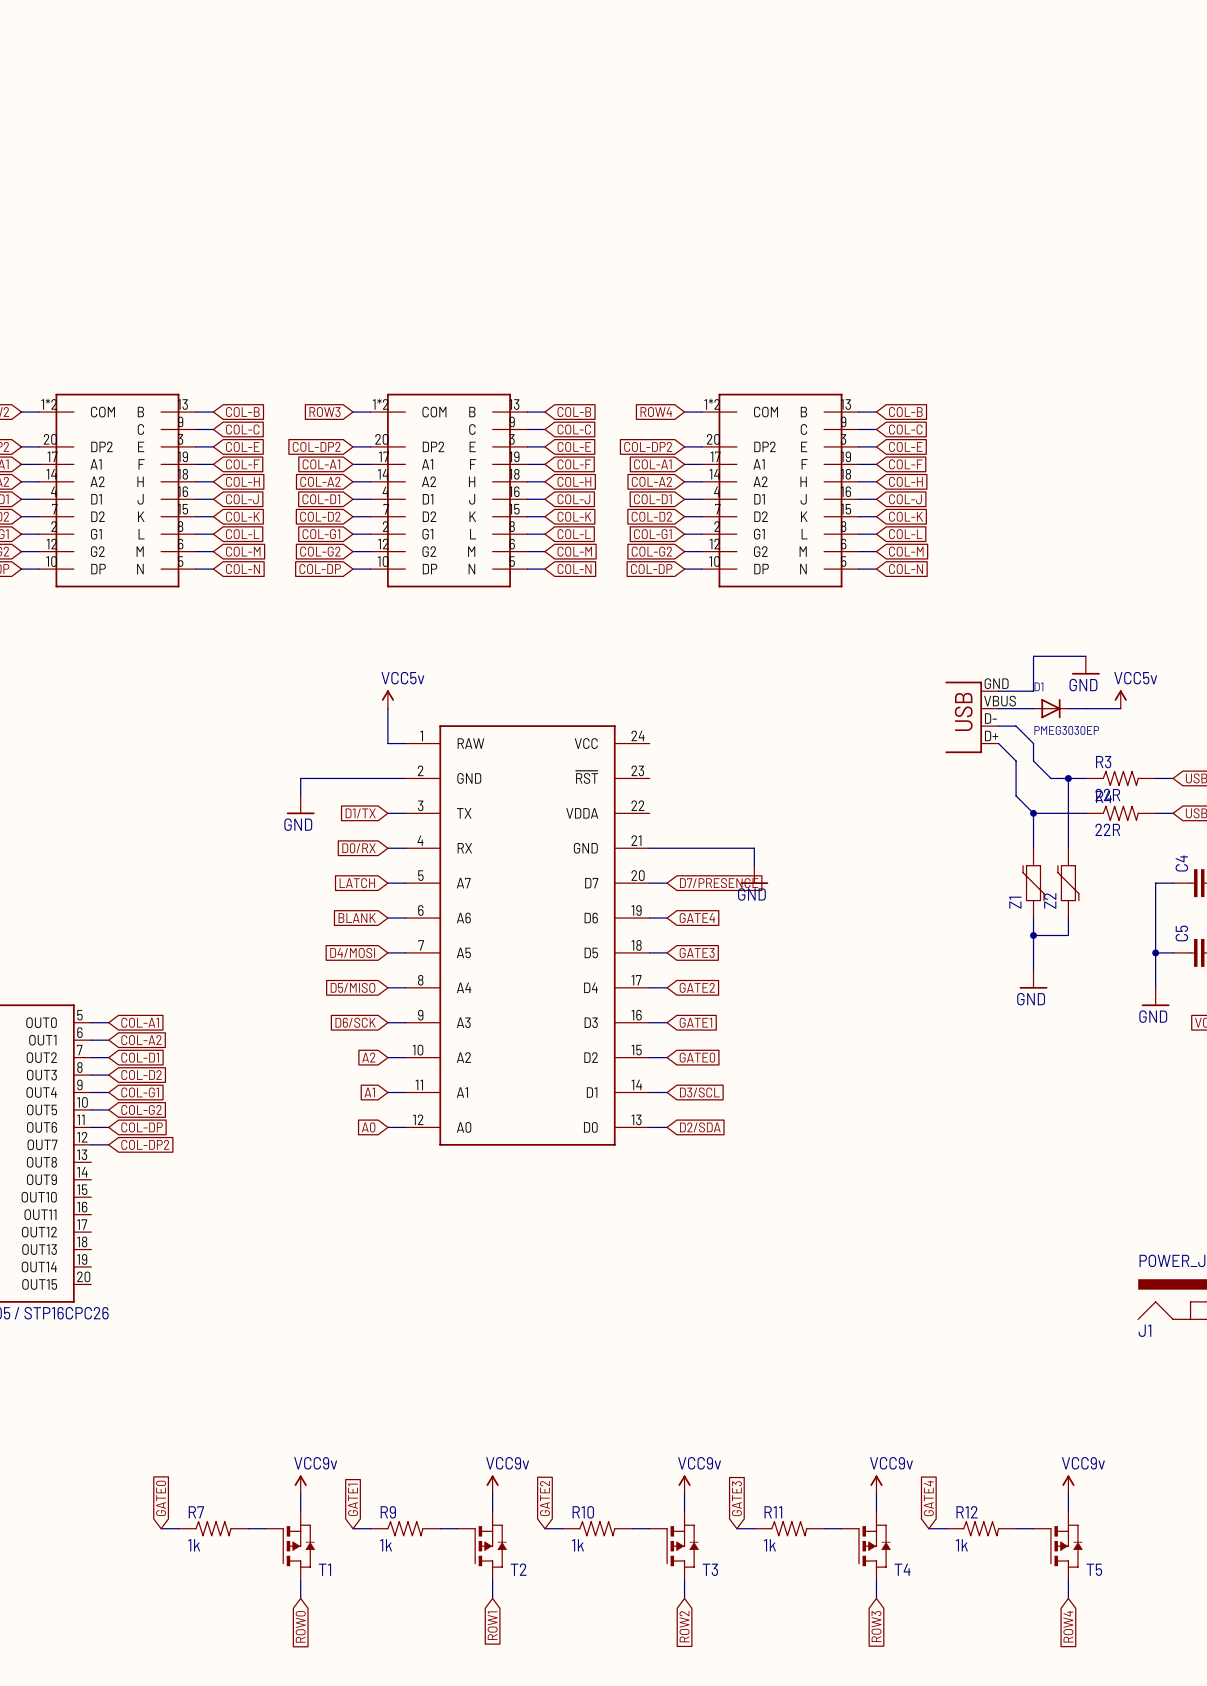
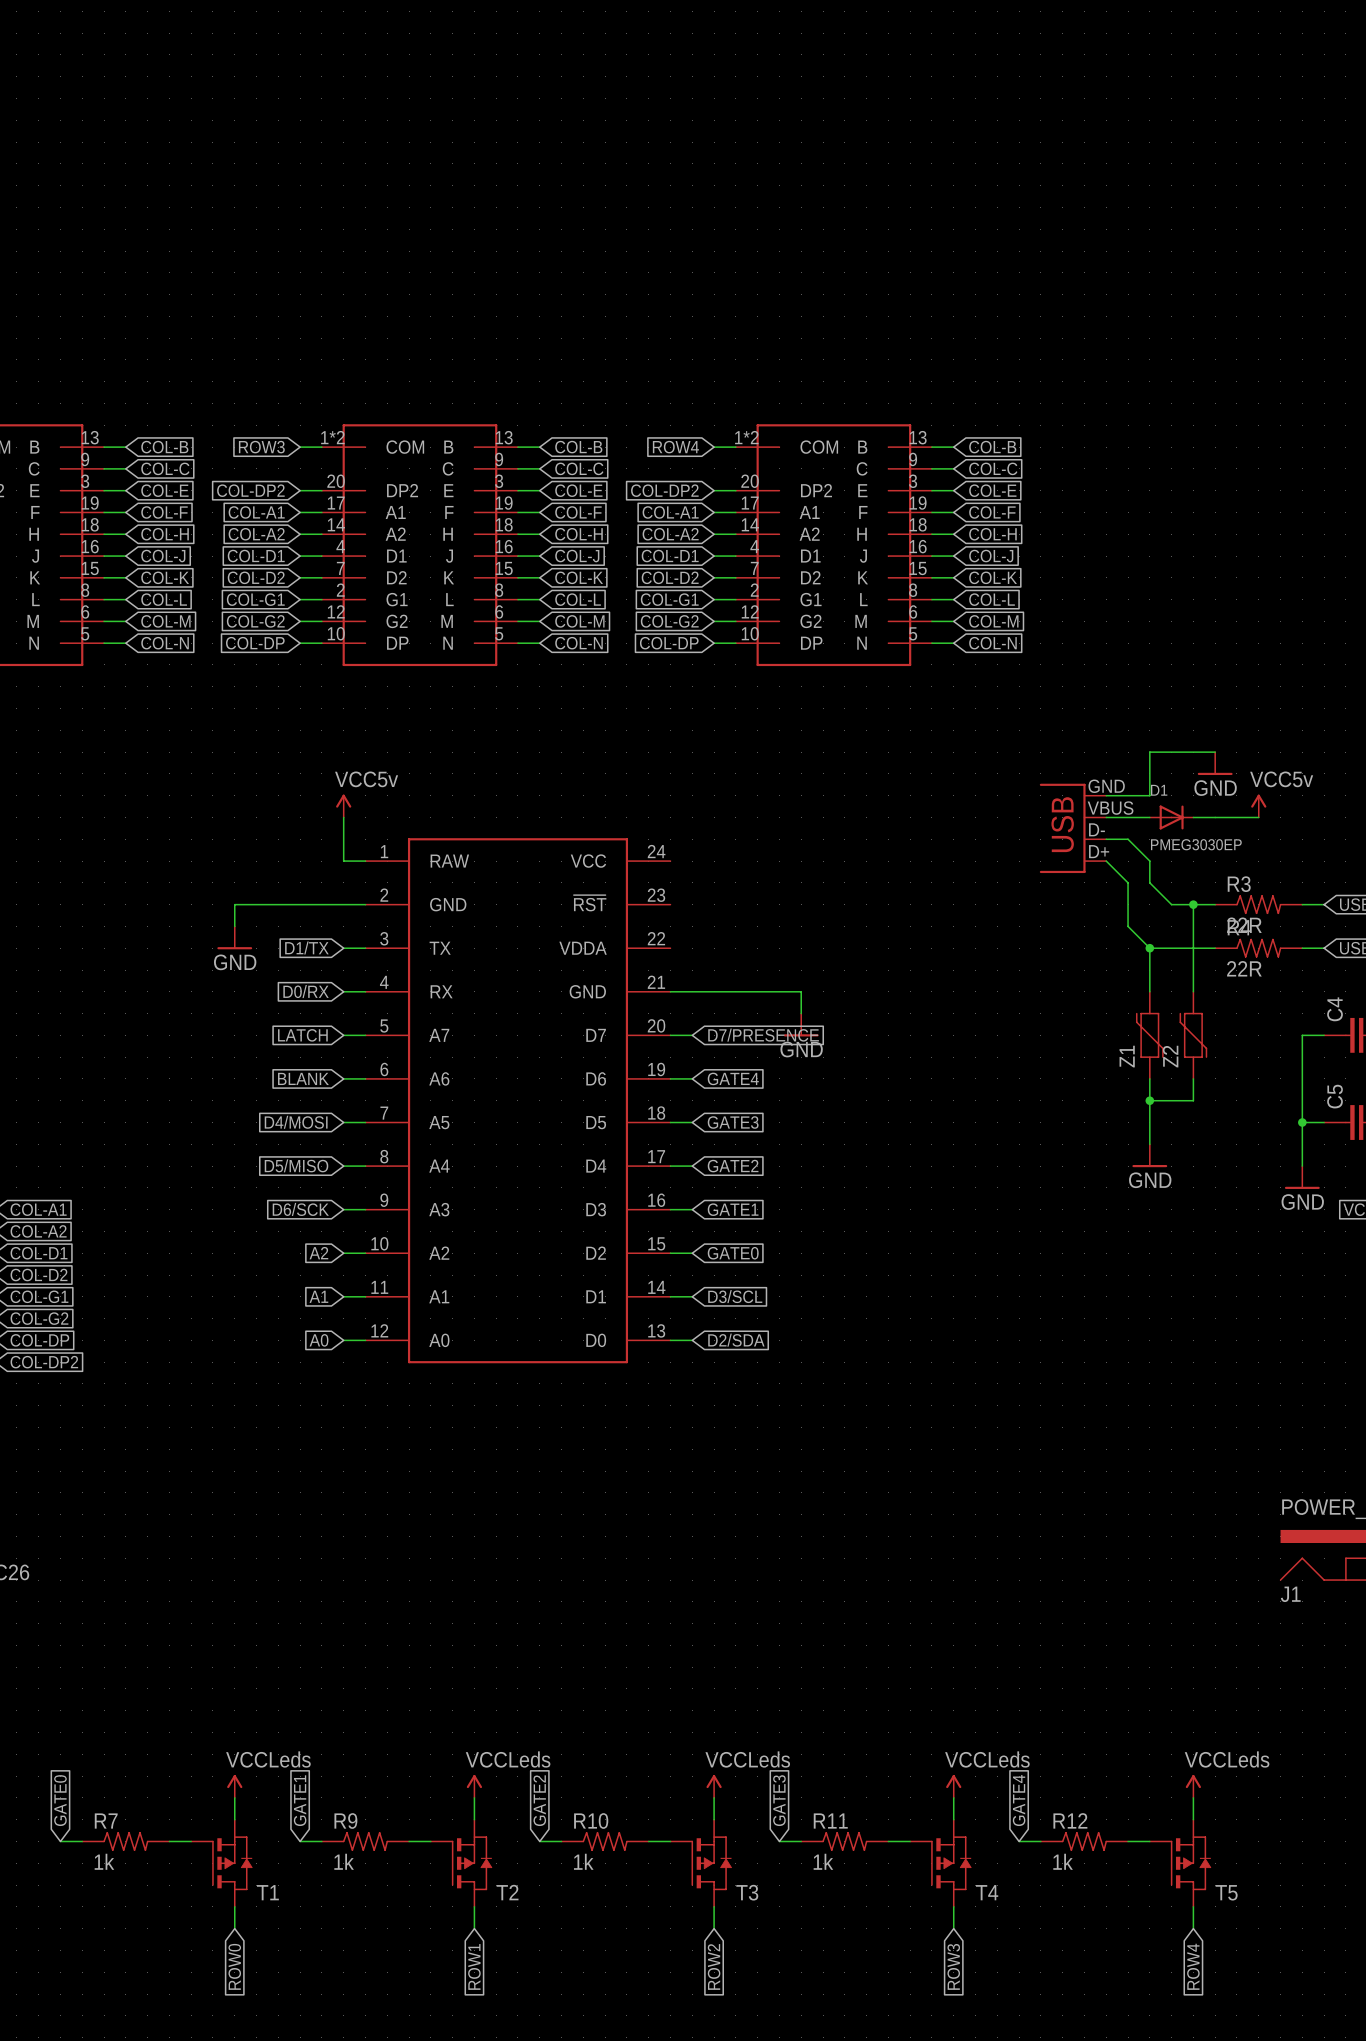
power symbol: VCC9v (300, 1484) -> VCCLeds (234, 1786)
power symbol: VCC9v (492, 1484) -> VCCLeds (474, 1786)
power symbol: VCC9v (684, 1484) -> VCCLeds (714, 1786)
power symbol: VCC9v (876, 1484) -> VCCLeds (953, 1786)
power symbol: VCC9v (1068, 1484) -> VCCLeds (1193, 1786)

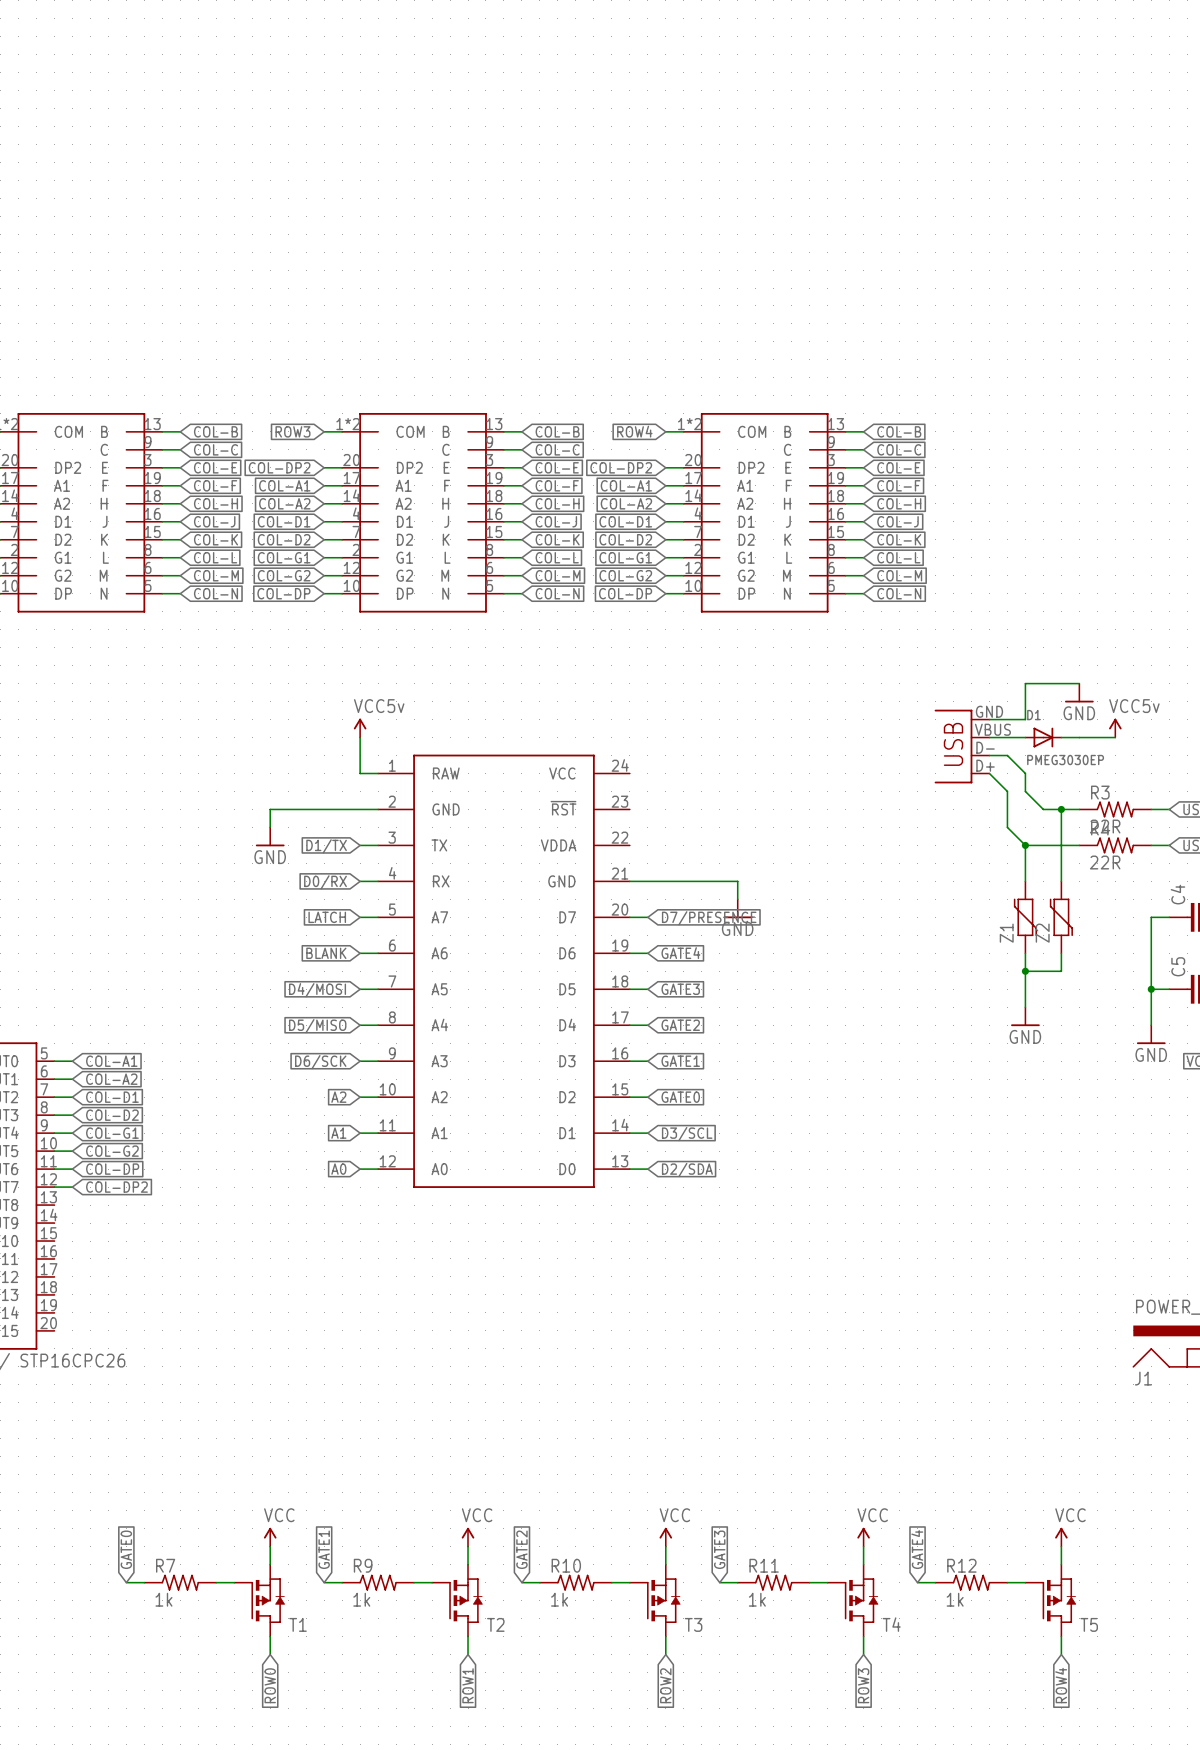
power symbol: VCCLeds (234, 1786) -> VCC (270, 1537)
power symbol: VCCLeds (474, 1786) -> VCC (468, 1537)
power symbol: VCCLeds (714, 1786) -> VCC (665, 1537)
power symbol: VCCLeds (953, 1786) -> VCC (863, 1537)
power symbol: VCCLeds (1193, 1786) -> VCC (1061, 1537)

